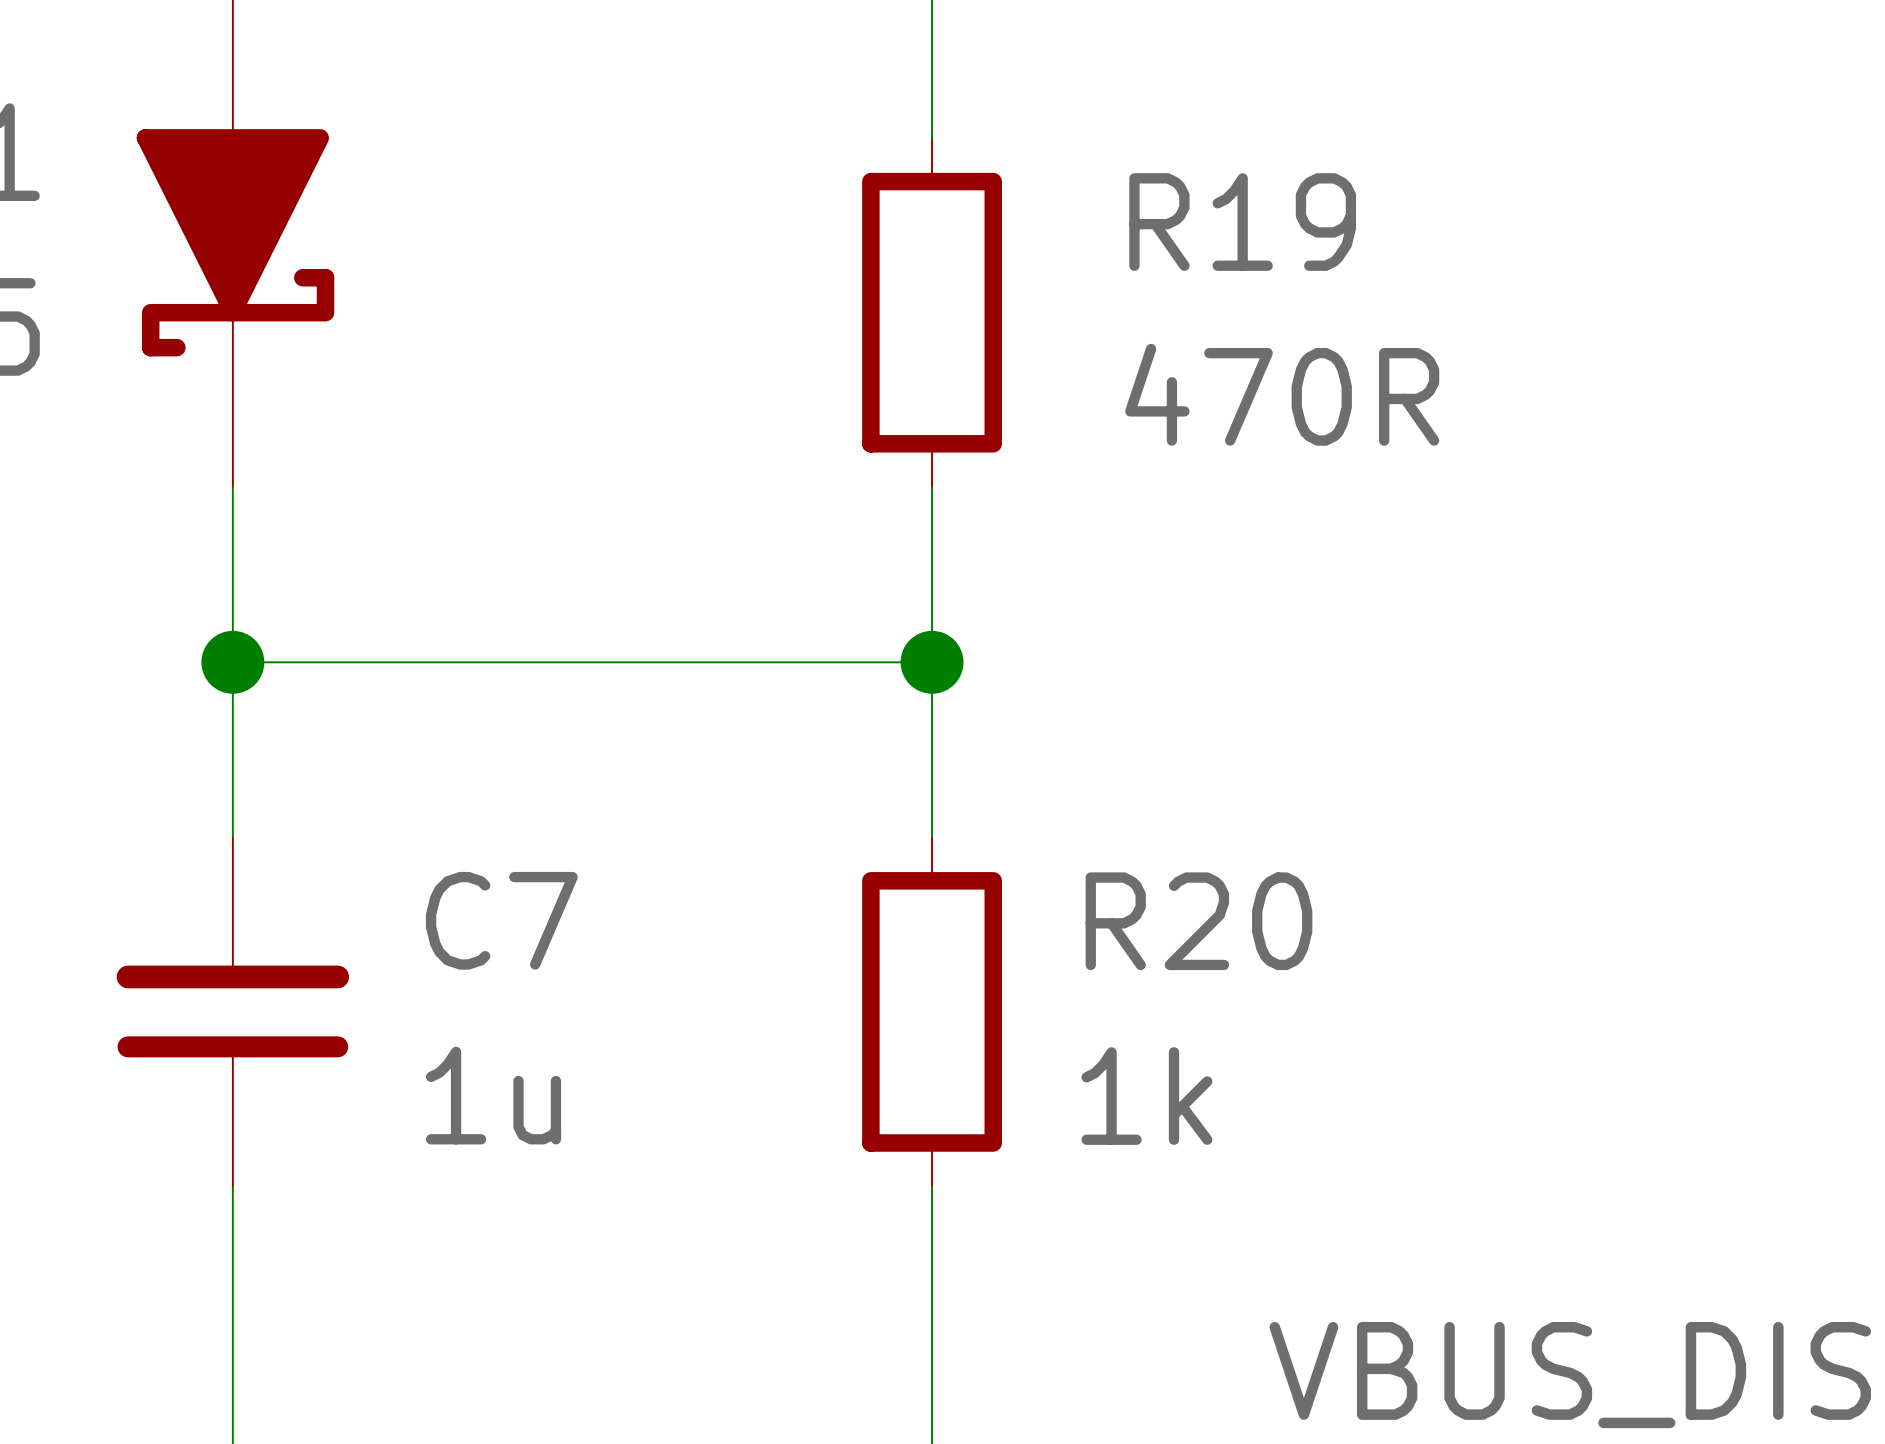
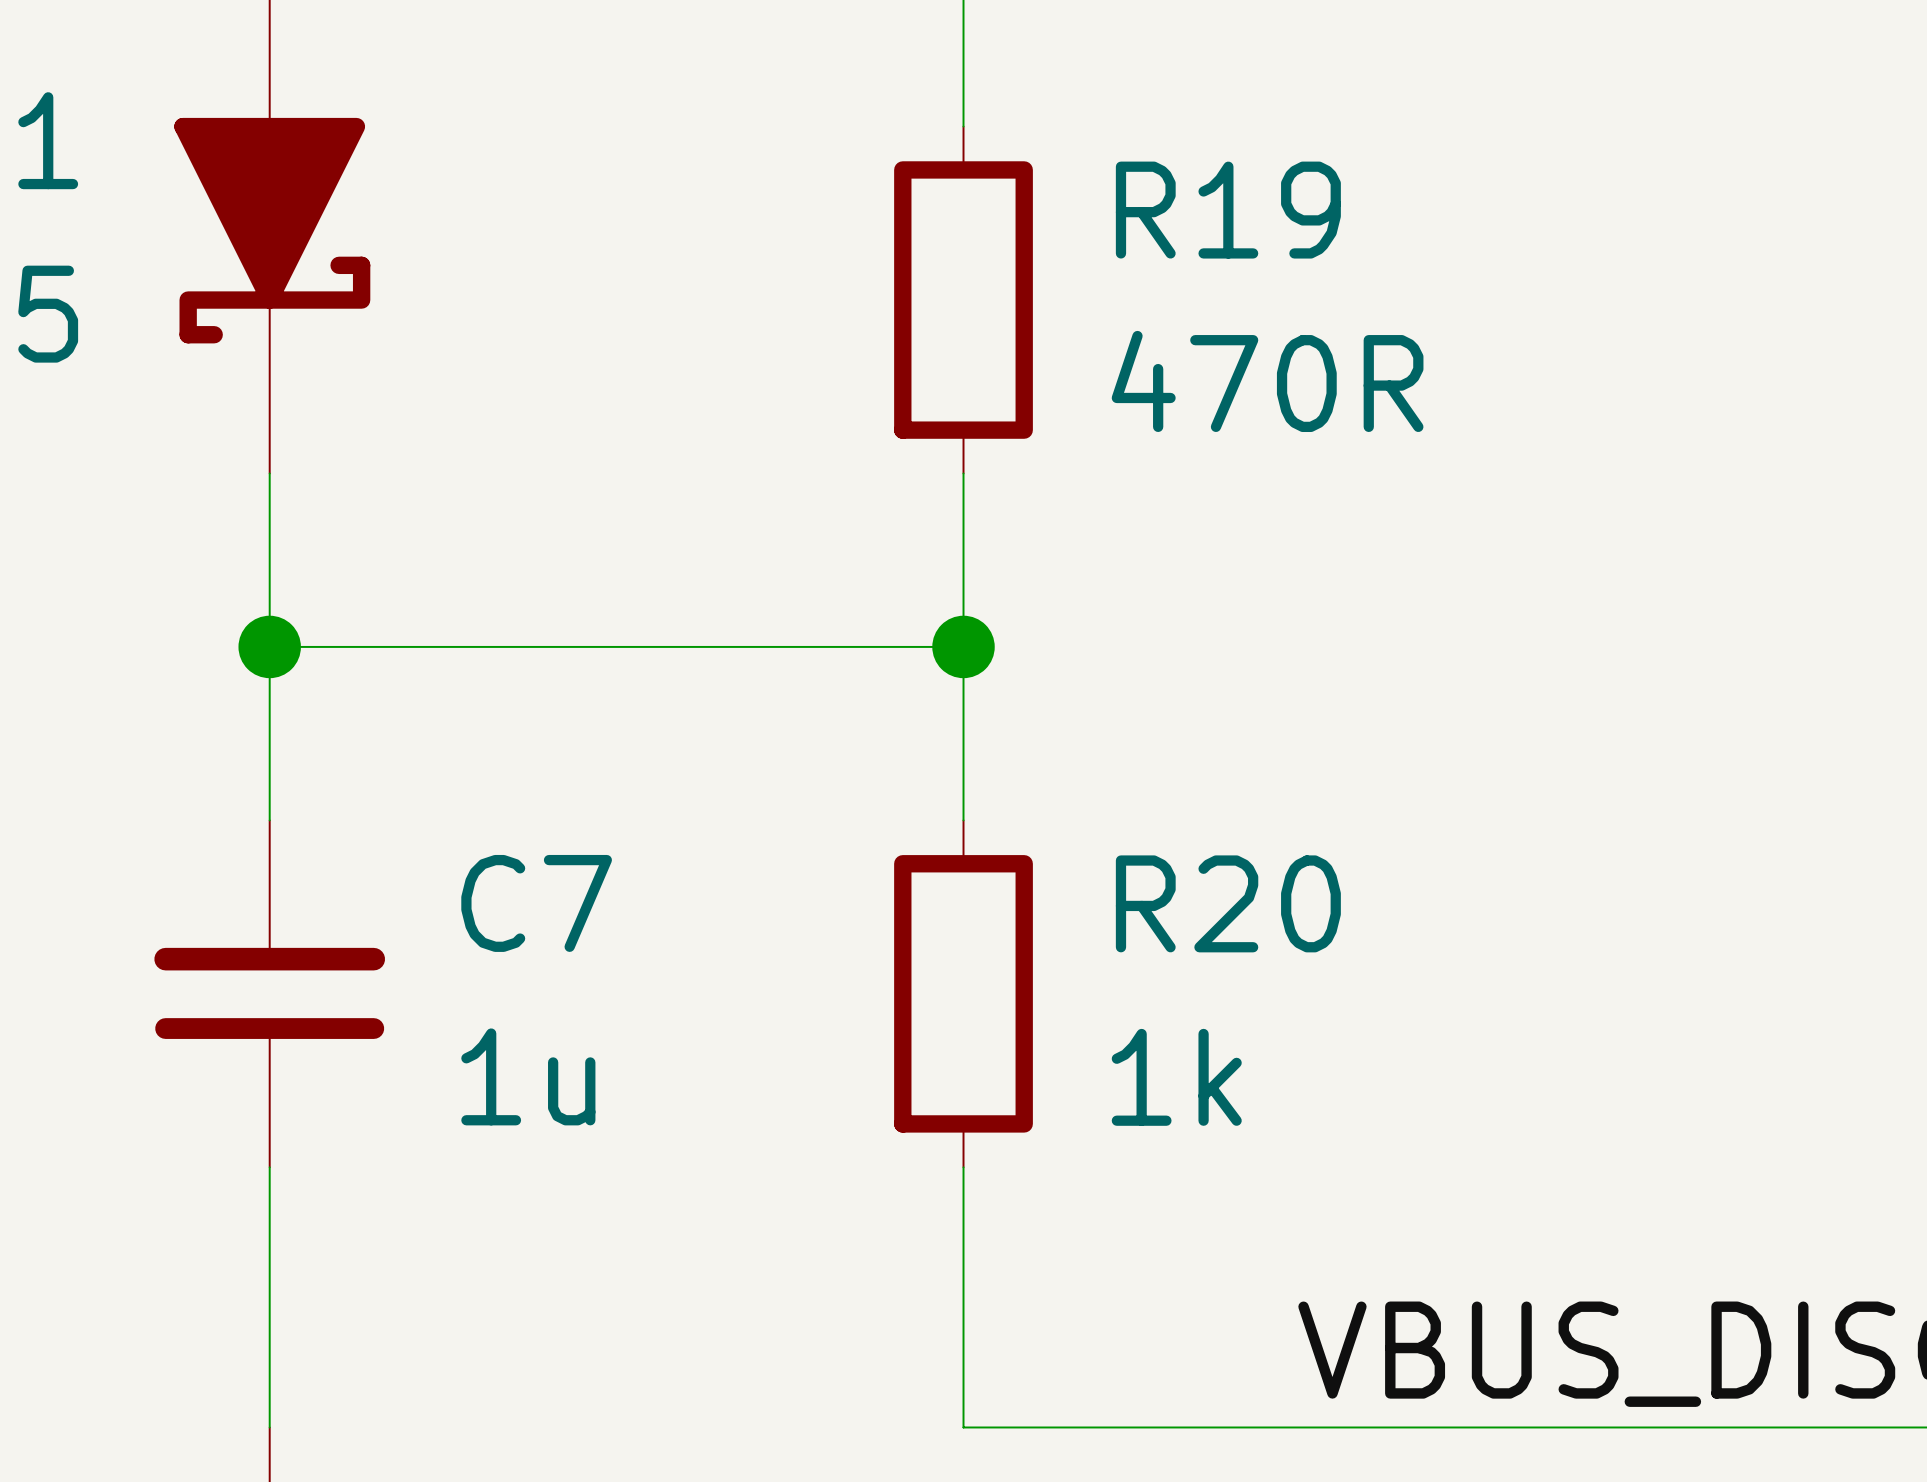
R19 name position: R19 (1242, 222) -> R19 (1228, 210)
R19 text position: 470R (1282, 394) -> 470R (1267, 381)

